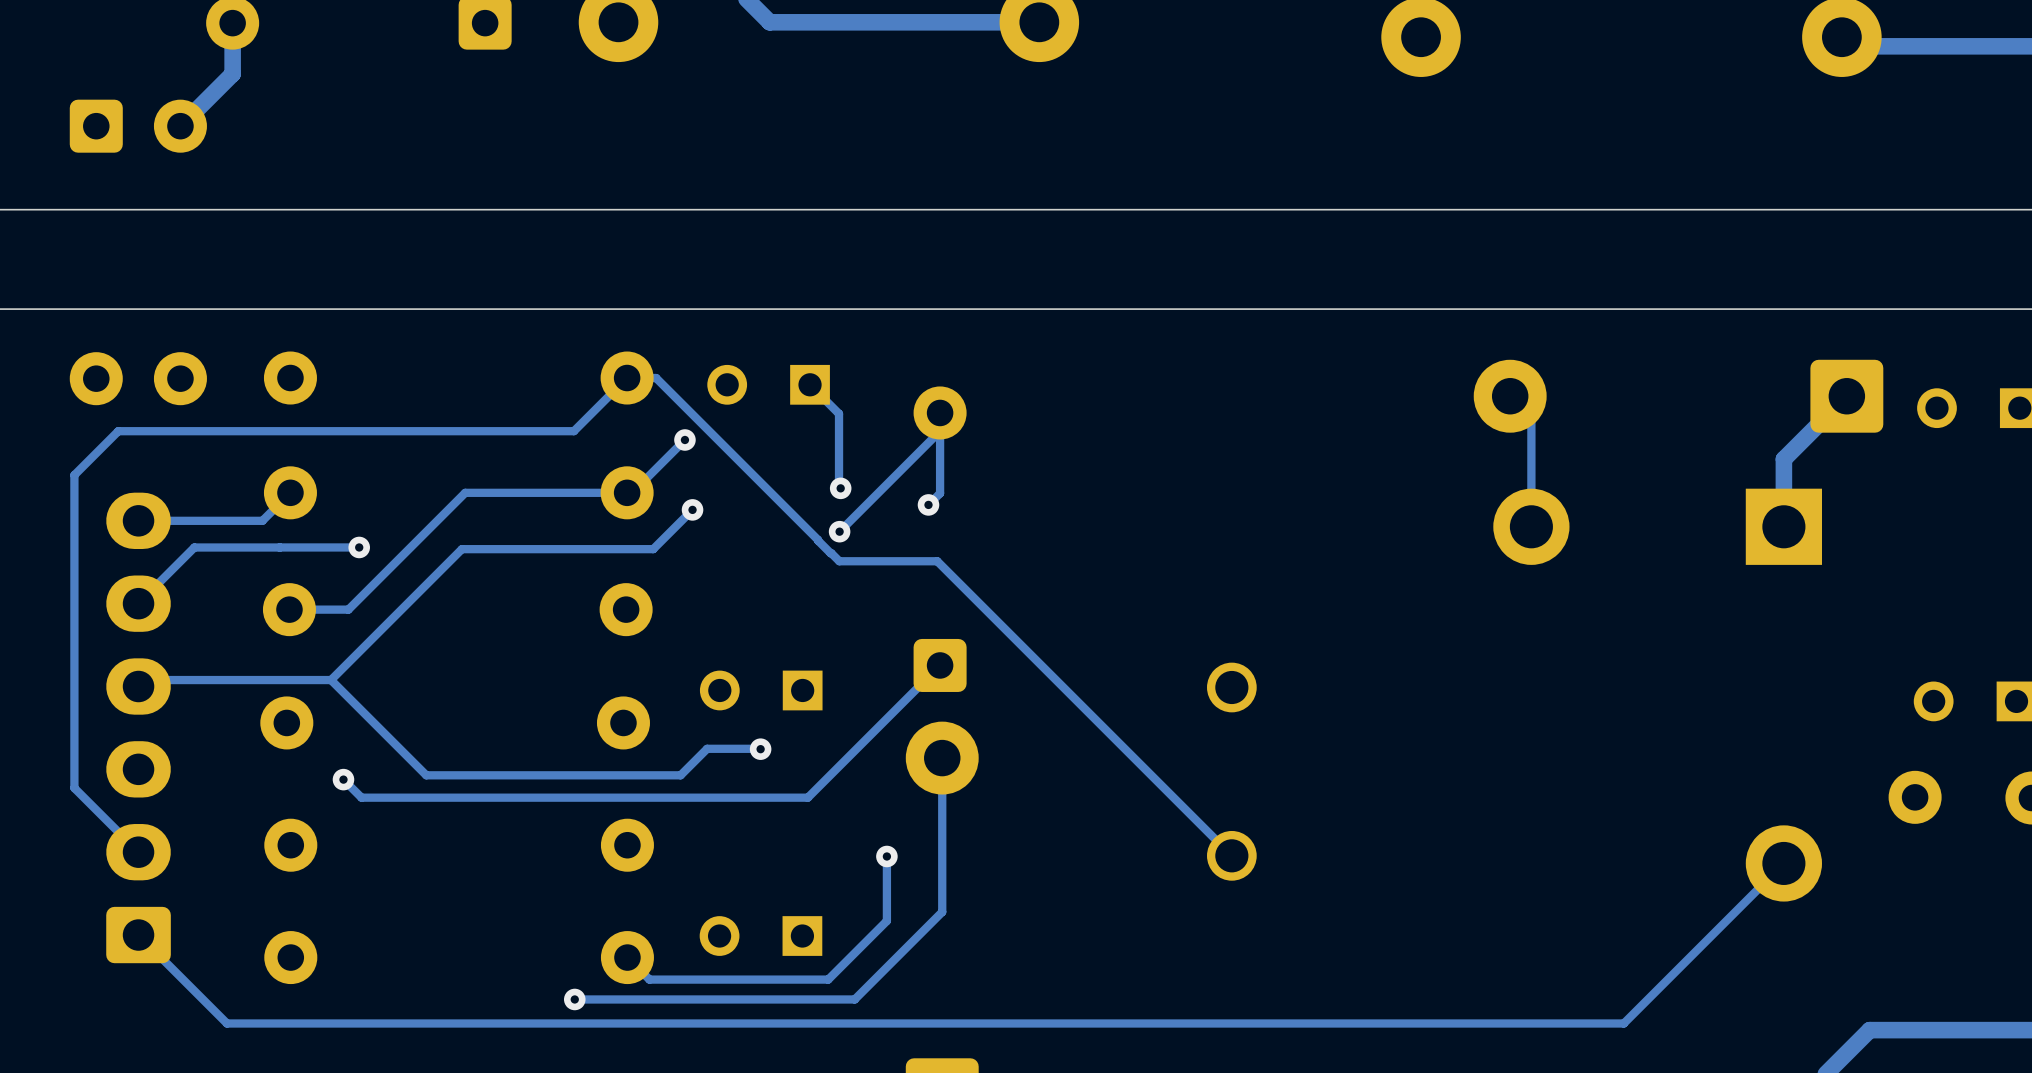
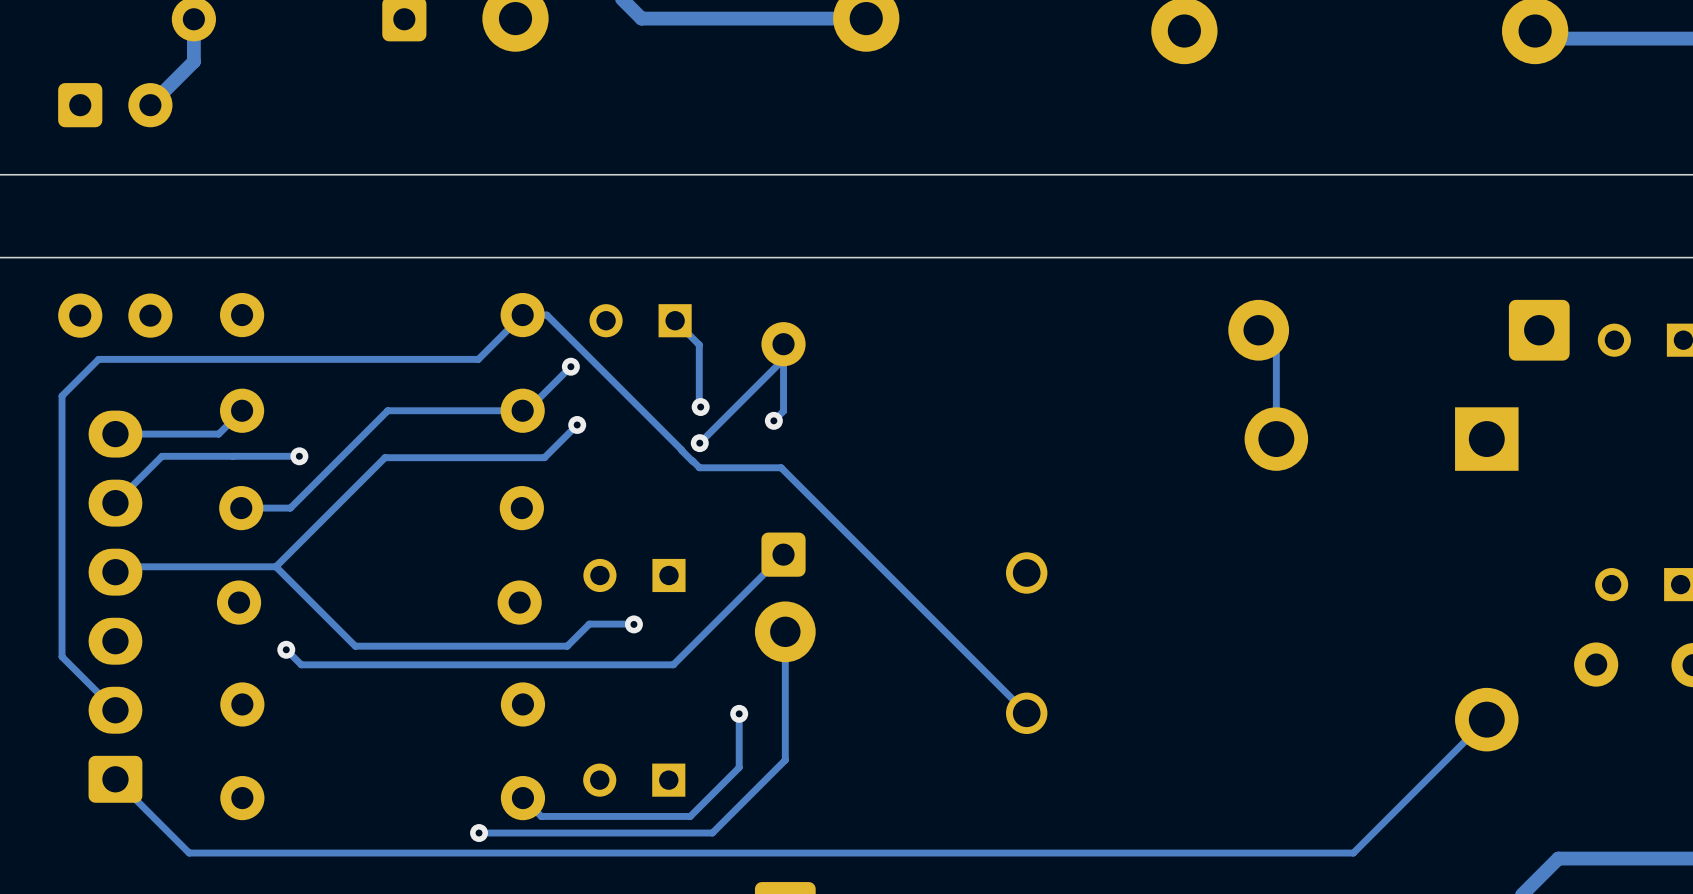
track: (1846, 396) (1783, 459) (1783, 526) -> none

